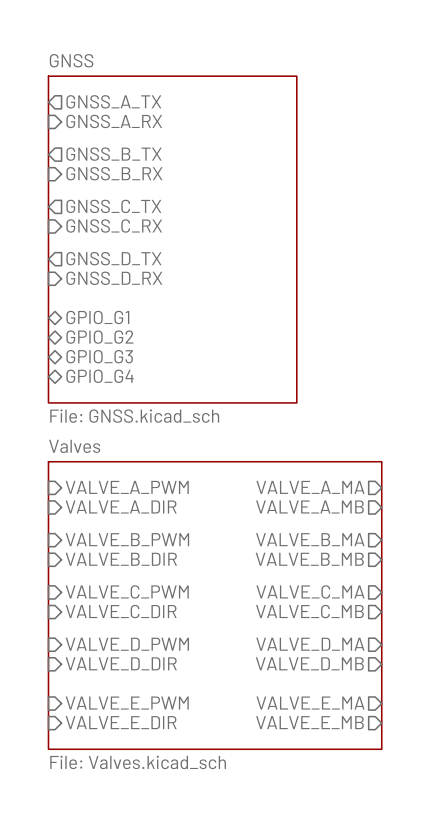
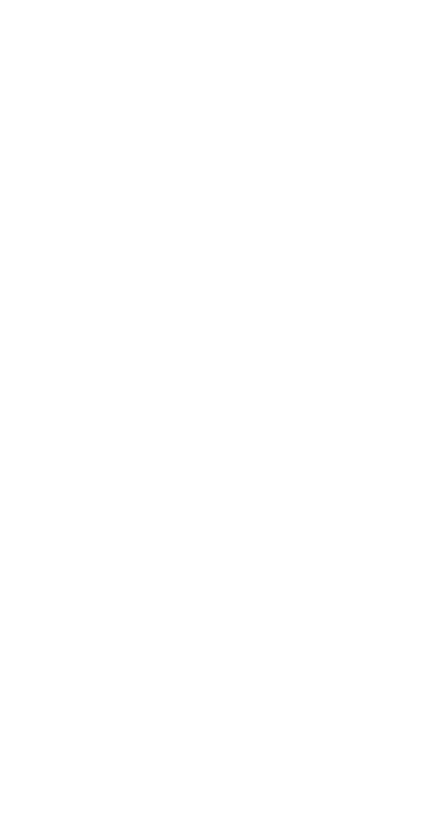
sheet pin: GNSS_A_TX (113, 101) -> none
sheet pin: GNSS_A_RX (114, 121) -> none
sheet pin: GNSS_B_TX (114, 154) -> none
sheet pin: GNSS_B_RX (114, 173) -> none
sheet pin: GNSS_C_TX (113, 206) -> none
sheet pin: GNSS_C_RX (114, 226) -> none
sheet GNSS: File: GNSS.kicad_sch (172, 239) -> none
sheet pin: GNSS_D_TX (113, 258) -> none
sheet pin: GNSS_D_RX (114, 278) -> none
sheet pin: GPIO_G1 (97, 317) -> none
sheet pin: GPIO_G2 (99, 337) -> none
sheet pin: GPIO_G3 (99, 356) -> none
sheet pin: GPIO_G4 (100, 376) -> none
sheet pin: VALVE_A_PWM (127, 487) -> none
sheet pin: VALVE_A_MA (310, 487) -> none
sheet pin: VALVE_A_DIR (121, 506) -> none
sheet pin: VALVE_A_MB (309, 506) -> none
sheet pin: VALVE_B_PWM (127, 539) -> none
sheet pin: VALVE_B_MA (310, 539) -> none
sheet pin: VALVE_B_DIR (121, 559) -> none
sheet pin: VALVE_B_MB (309, 559) -> none
sheet pin: VALVE_C_PWM (127, 591) -> none
sheet pin: VALVE_C_MA (310, 591) -> none
sheet Valves: File: Valves.kicad_sch (215, 605) -> none
sheet pin: VALVE_C_DIR (121, 611) -> none
sheet pin: VALVE_C_MB (309, 611) -> none
sheet pin: VALVE_D_PWM (127, 644) -> none
sheet pin: VALVE_D_MA (310, 644) -> none
sheet pin: VALVE_D_DIR (121, 663) -> none
sheet pin: VALVE_D_MB (309, 663) -> none
sheet pin: VALVE_E_PWM (127, 703) -> none
sheet pin: VALVE_E_MA (310, 703) -> none
sheet pin: VALVE_E_DIR (121, 722) -> none
sheet pin: VALVE_E_MB (309, 722) -> none

